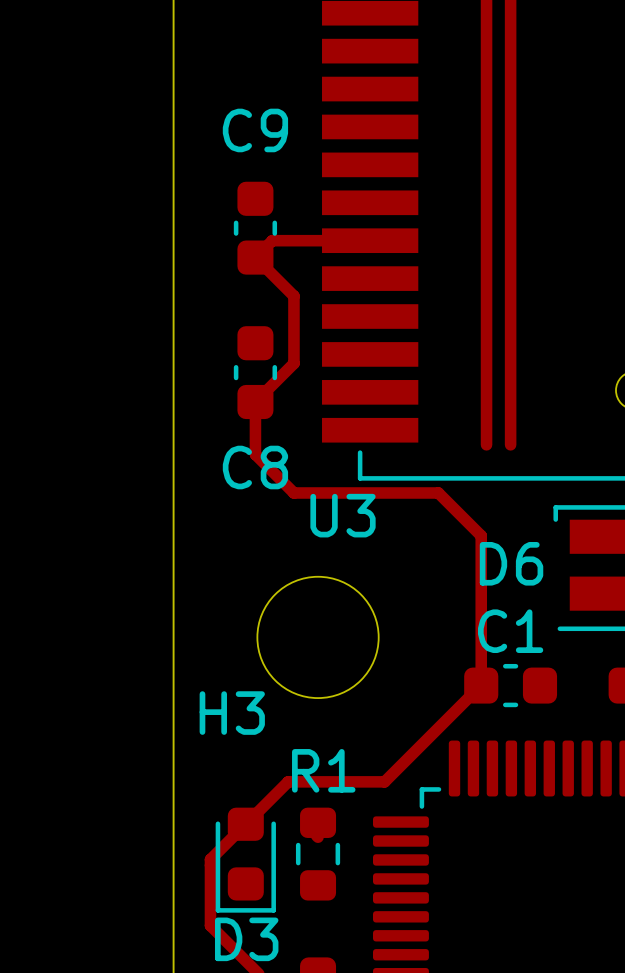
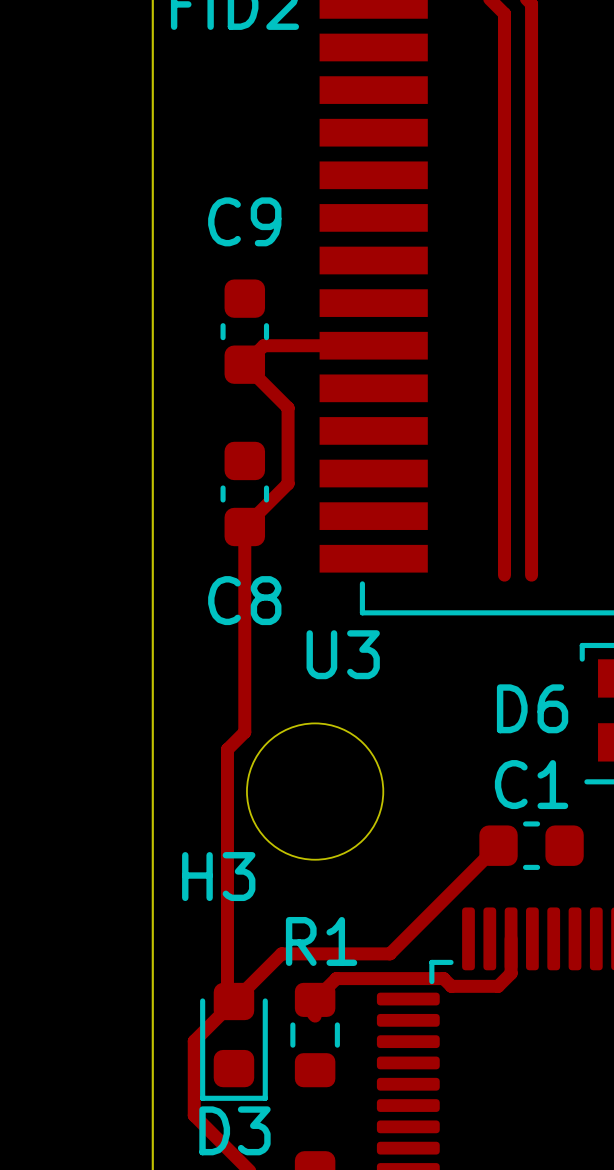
track: (255, 454) (293, 492) (438, 492) (481, 535) (481, 685) -> (244, 585) (244, 732) (227, 749) (227, 995) (233, 1001)
track: none -> (511, 938) (511, 973) (498, 986) (451, 986) (443, 978) (336, 978) (315, 999)

